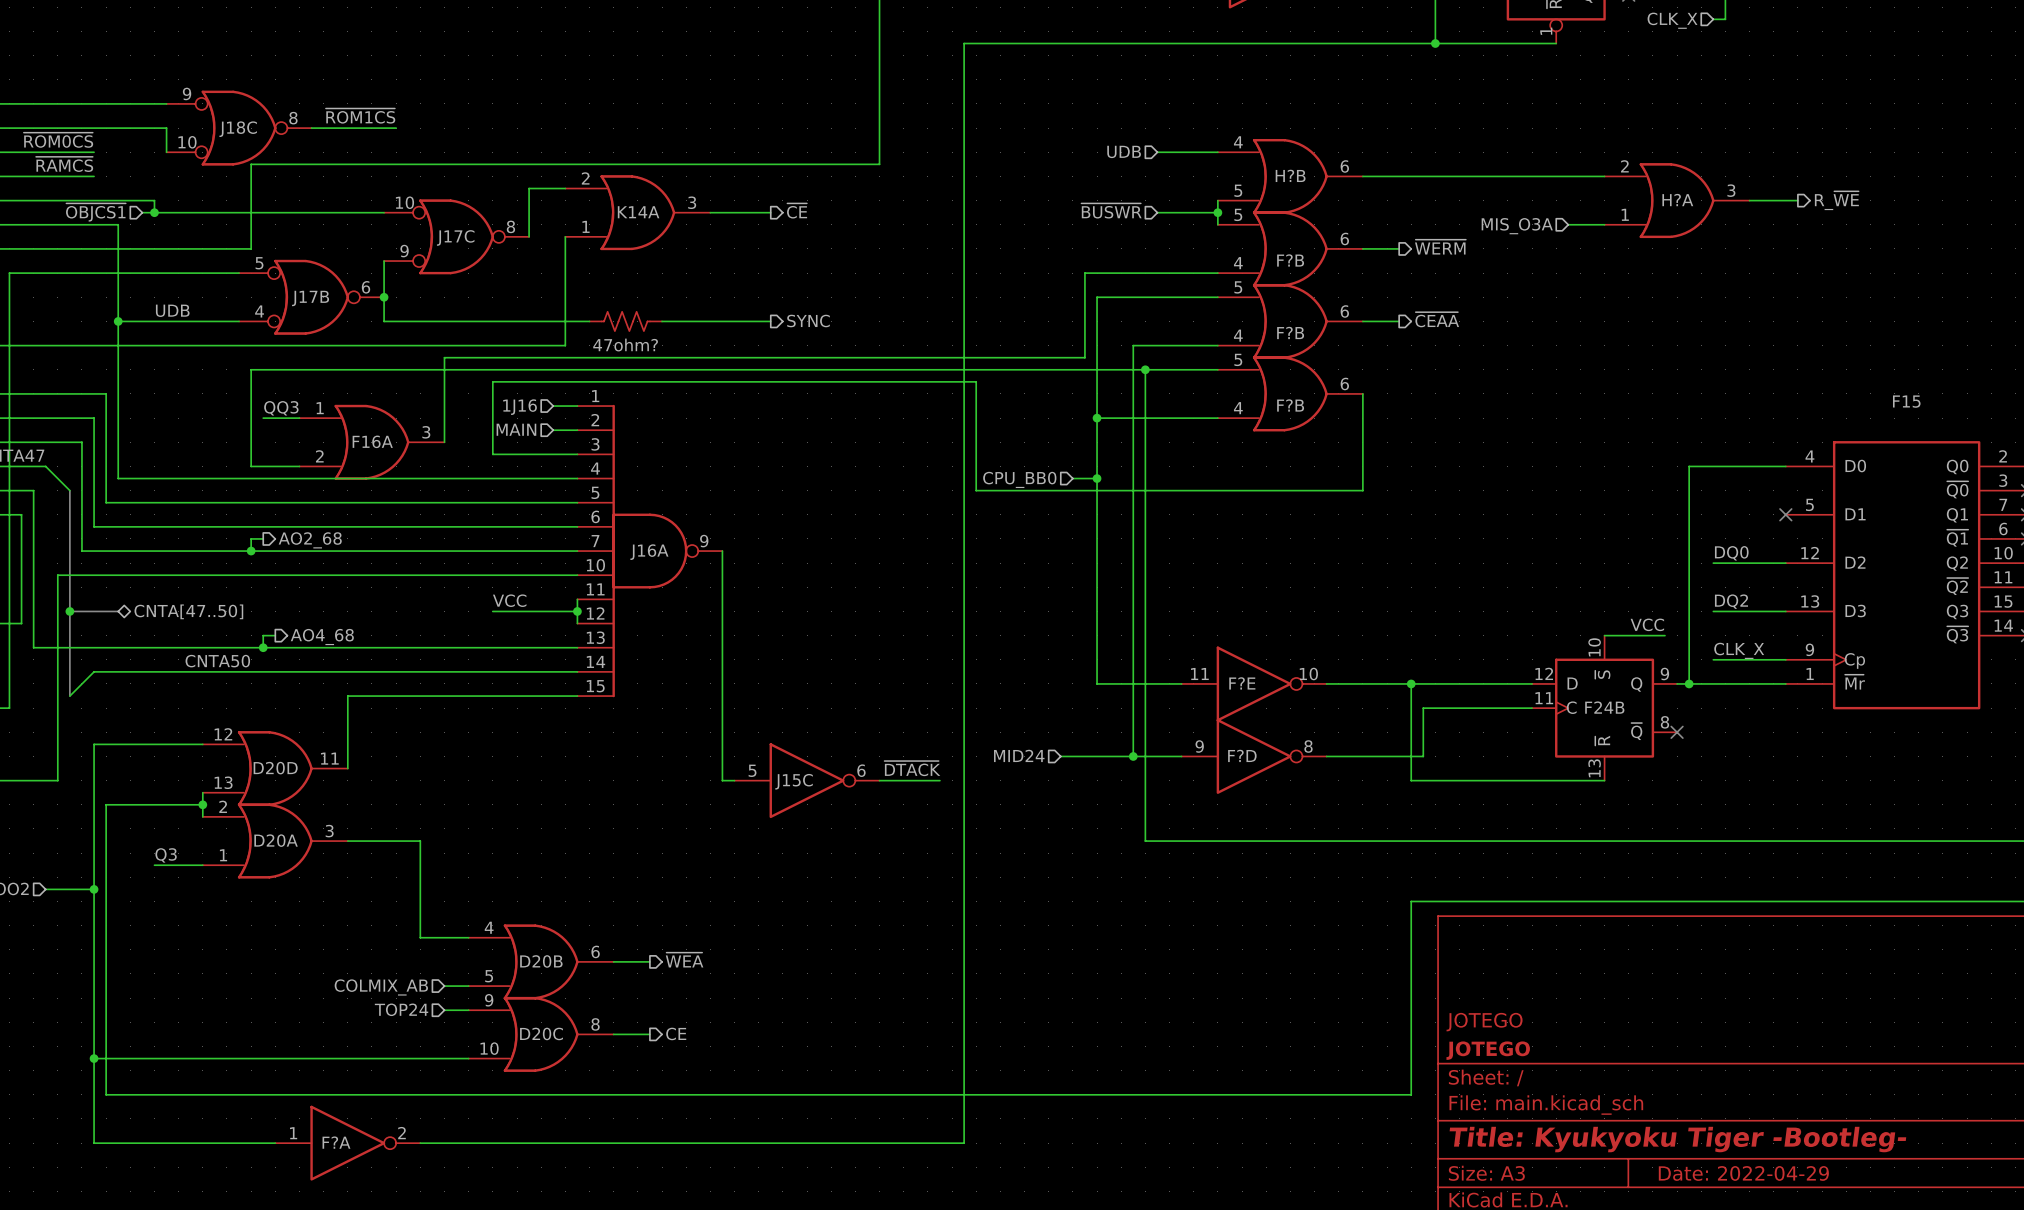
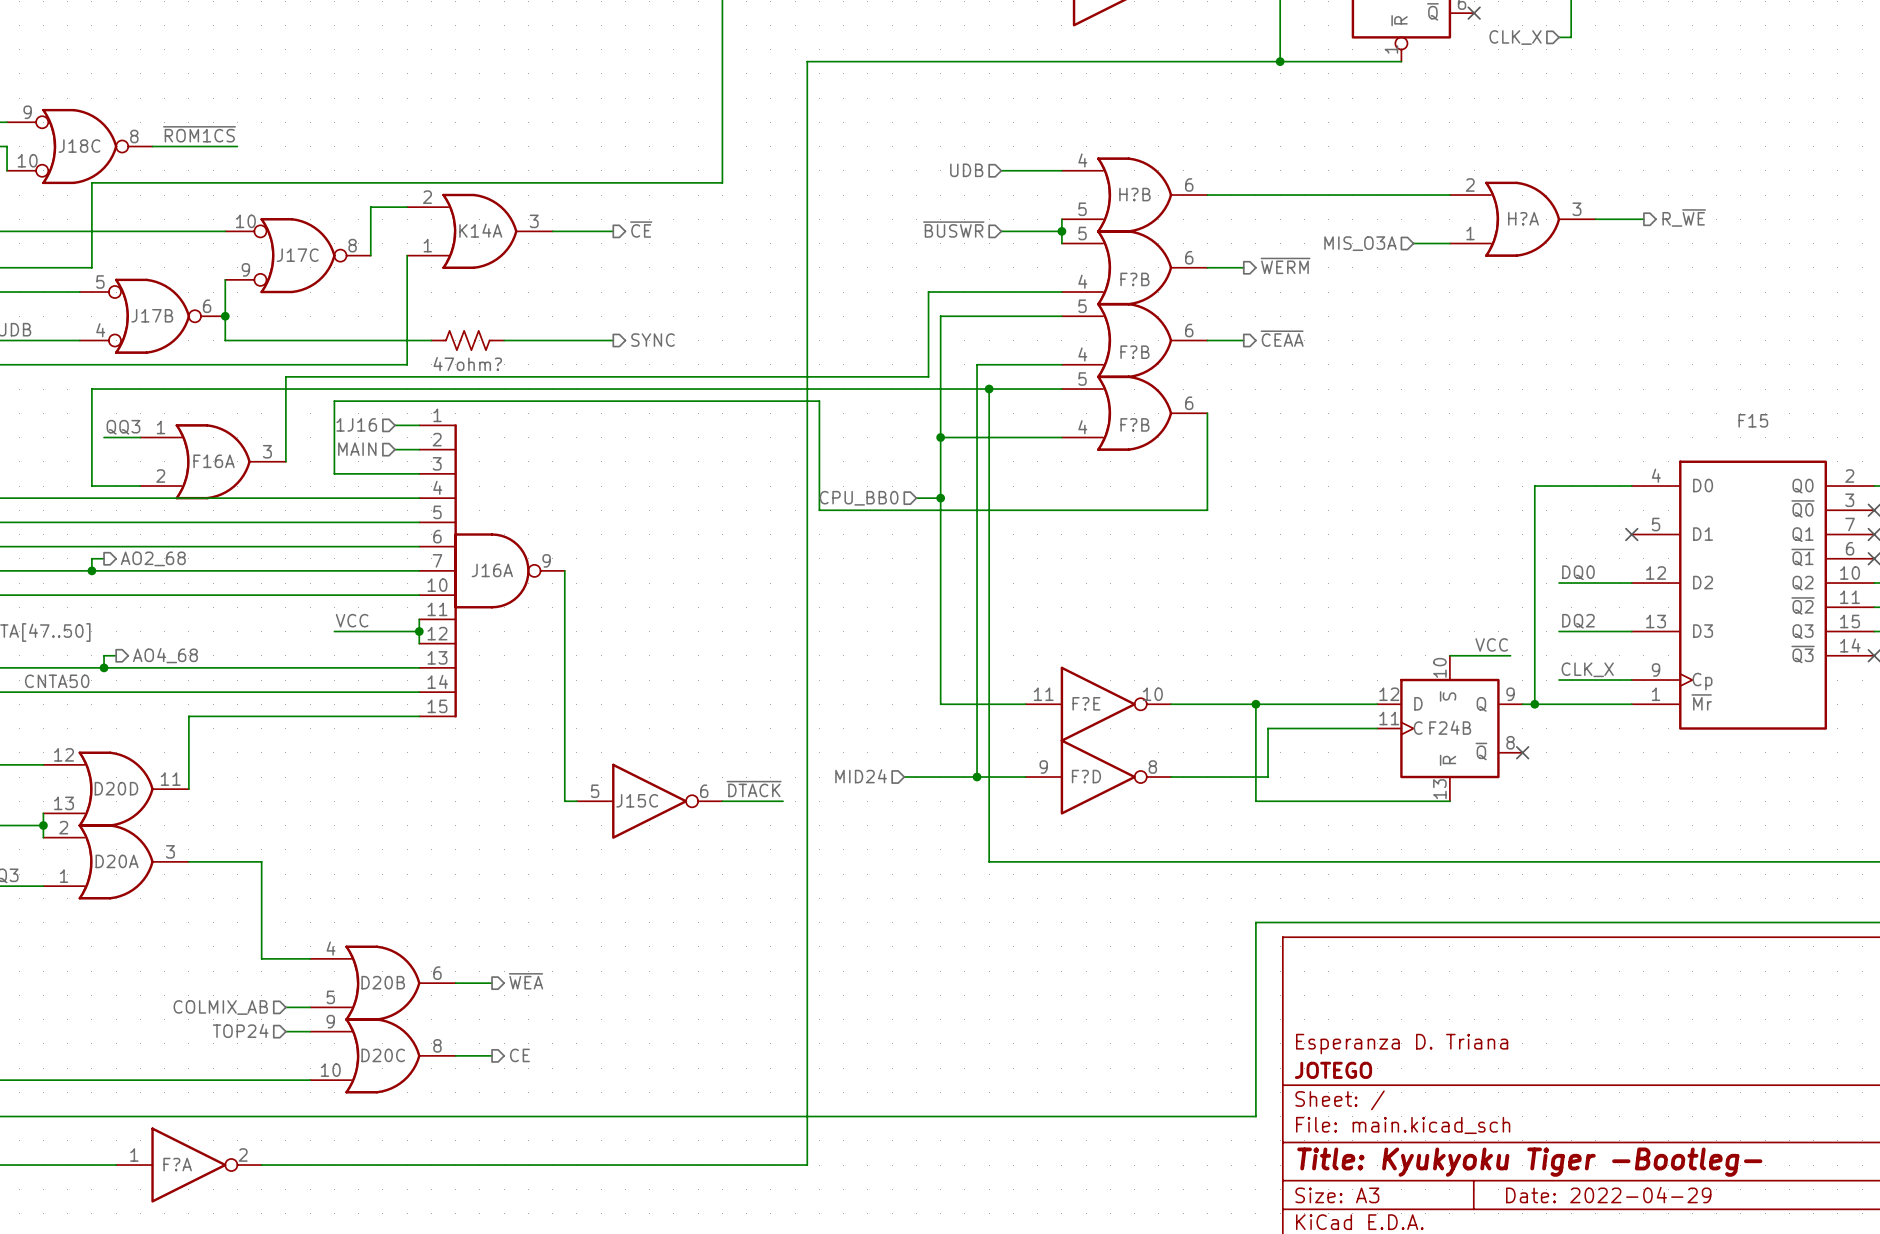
title block: JOTEGO (1484, 1022) -> Esperanza D. Triana (1402, 1044)

